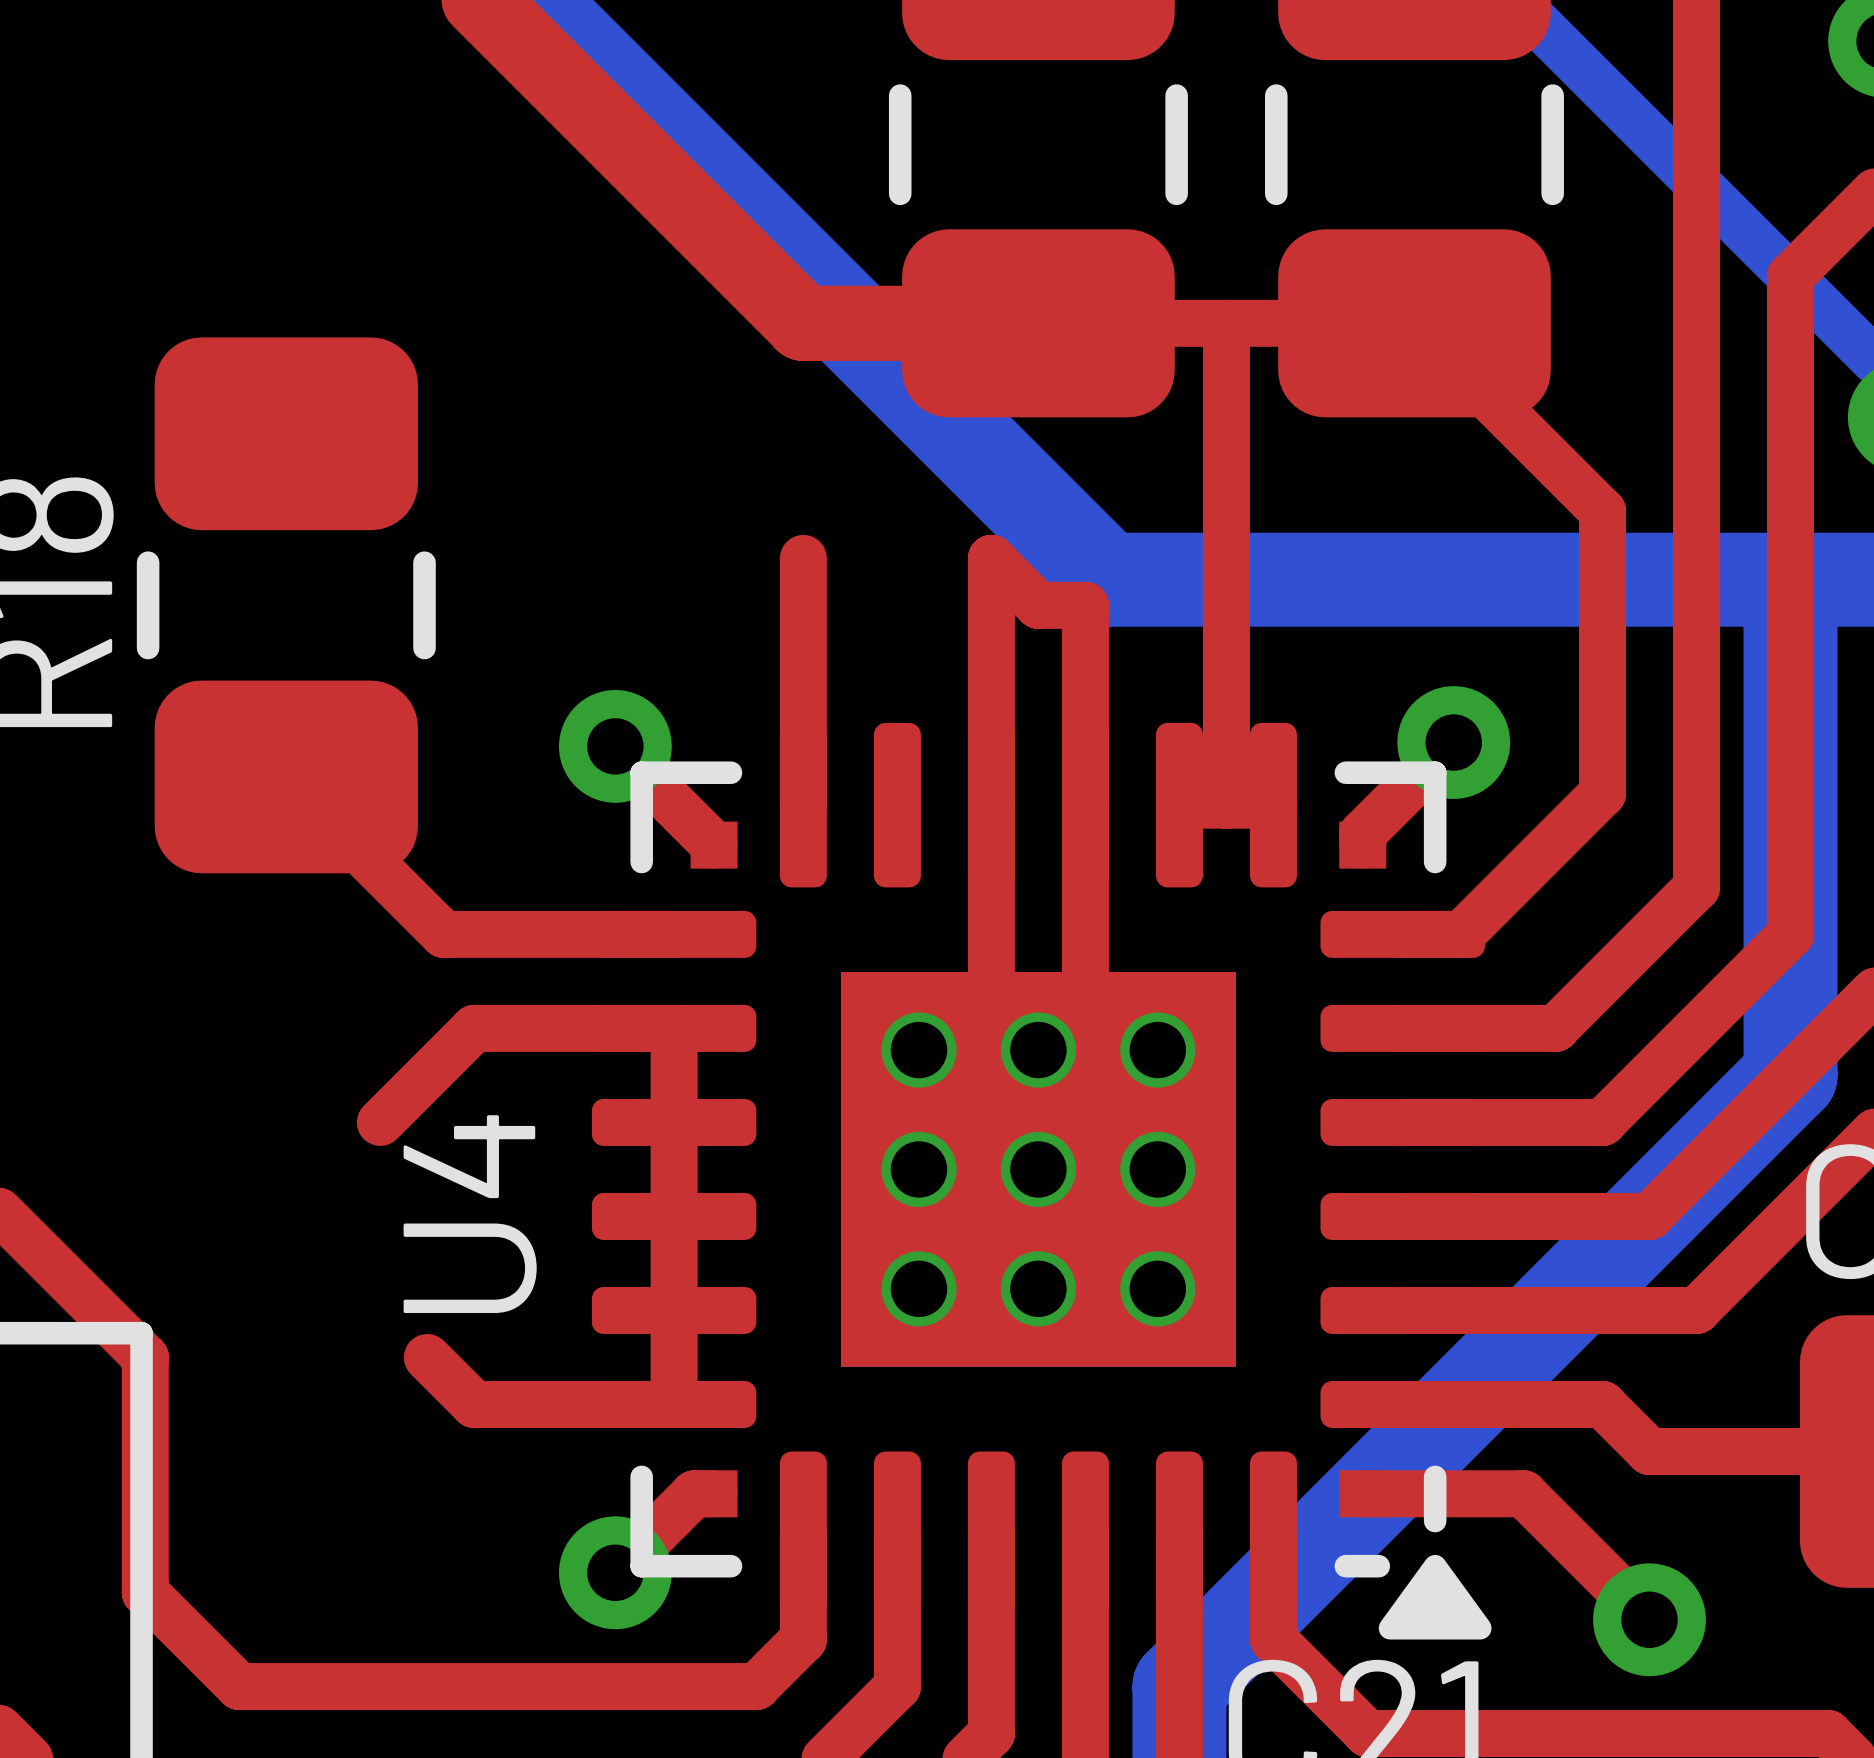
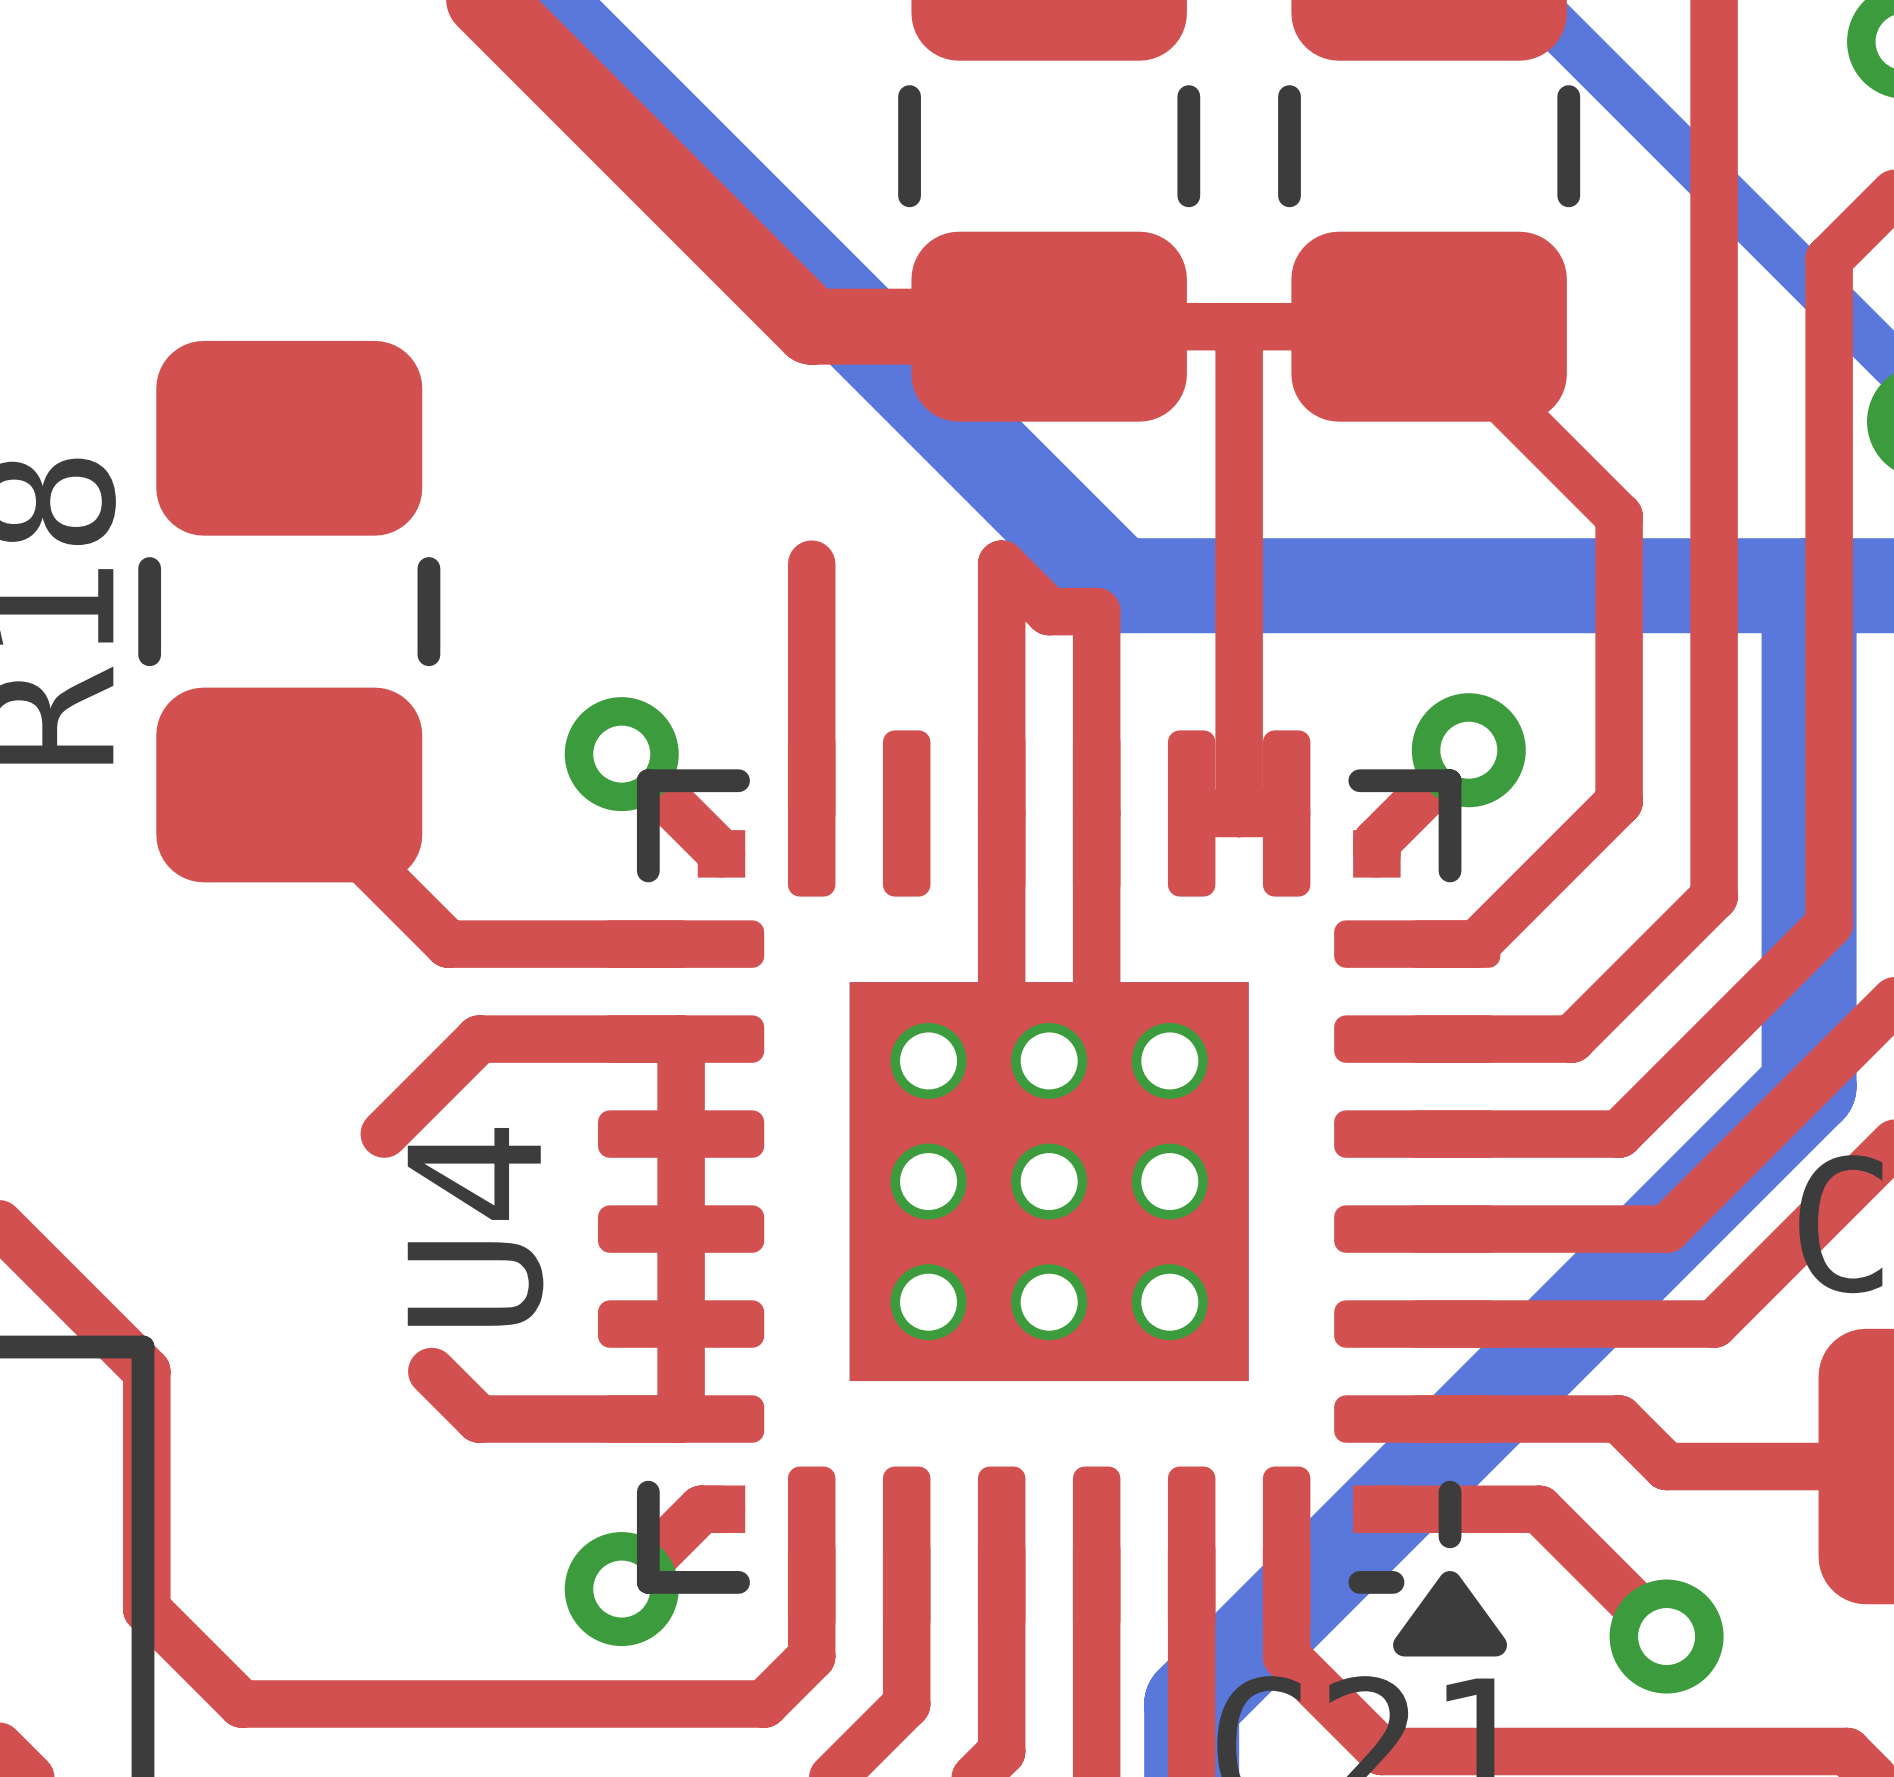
top track: (1810, 256) (1790, 276) (1790, 934) -> (1829, 259) (1829, 924) (1809, 944)

